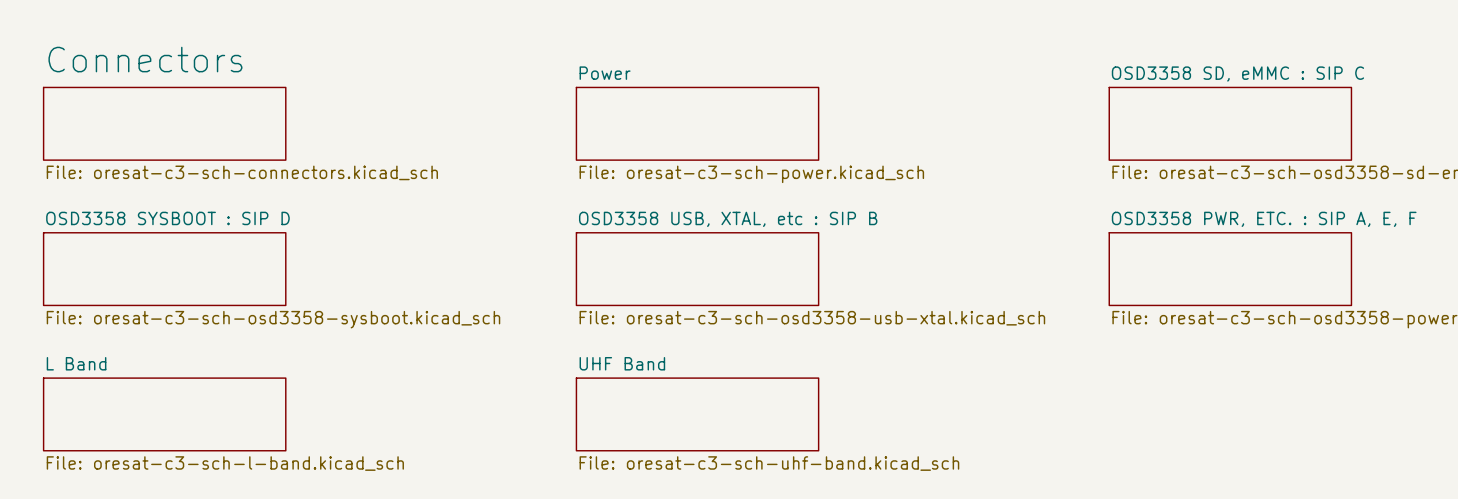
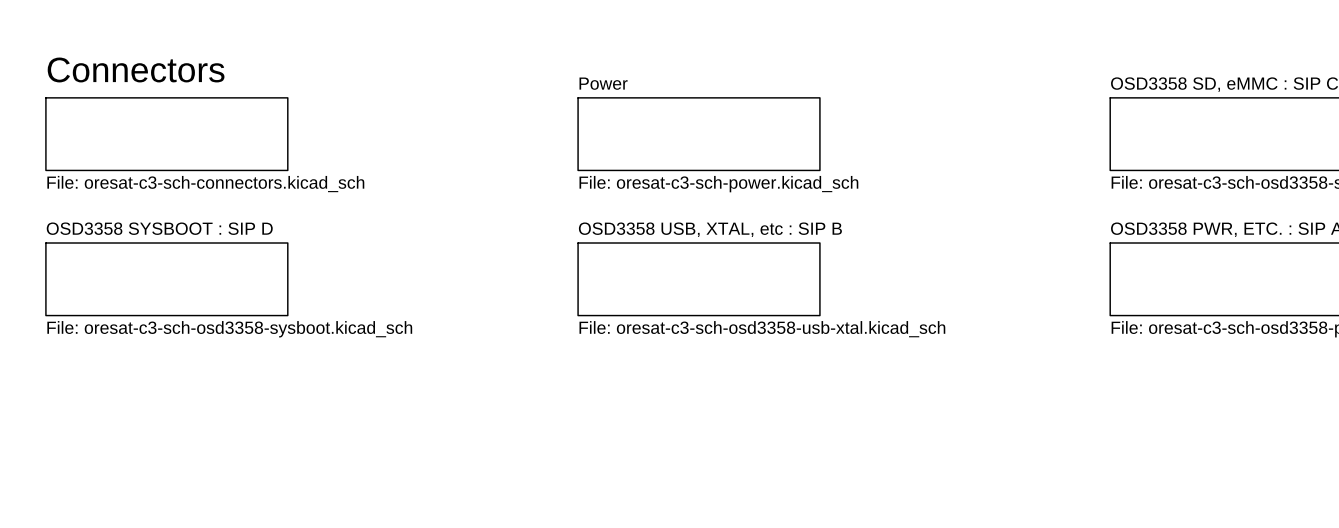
sheet L Band: File: oresat-c3-sch-l-band.kicad_sch (164, 414) -> none
sheet UHF Band: File: oresat-c3-sch-uhf-band.kicad_sch (697, 414) -> none

